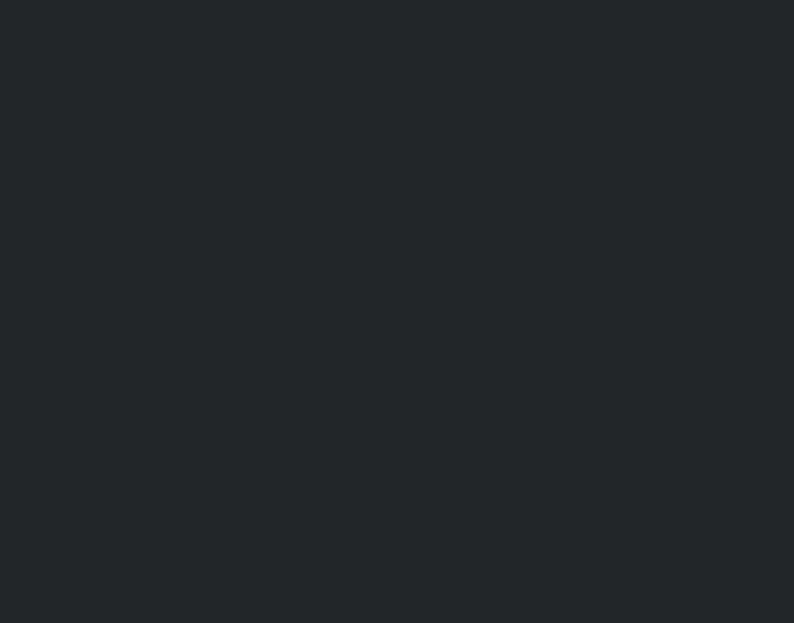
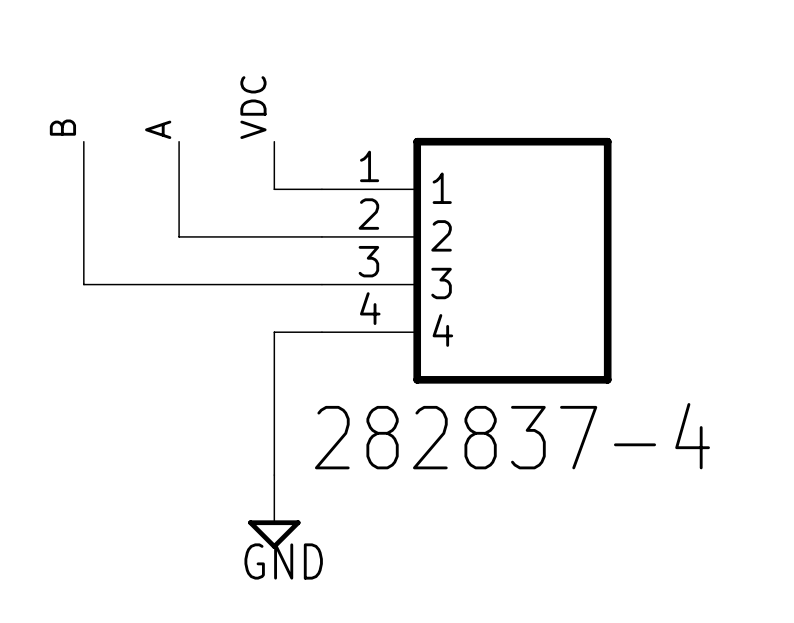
label: none -> VDC (253, 107)
label: none -> B (62, 127)
label: none -> A (158, 129)
wire: none -> (83, 141) (83, 284) (321, 284)
wire: none -> (179, 141) (179, 236) (321, 236)
wire: none -> (274, 141) (274, 189) (321, 189)
part: none -> 282837-4 (466, 260)
wire: none -> (321, 332) (274, 332) (274, 475)
power symbol: none -> GND (274, 511)

